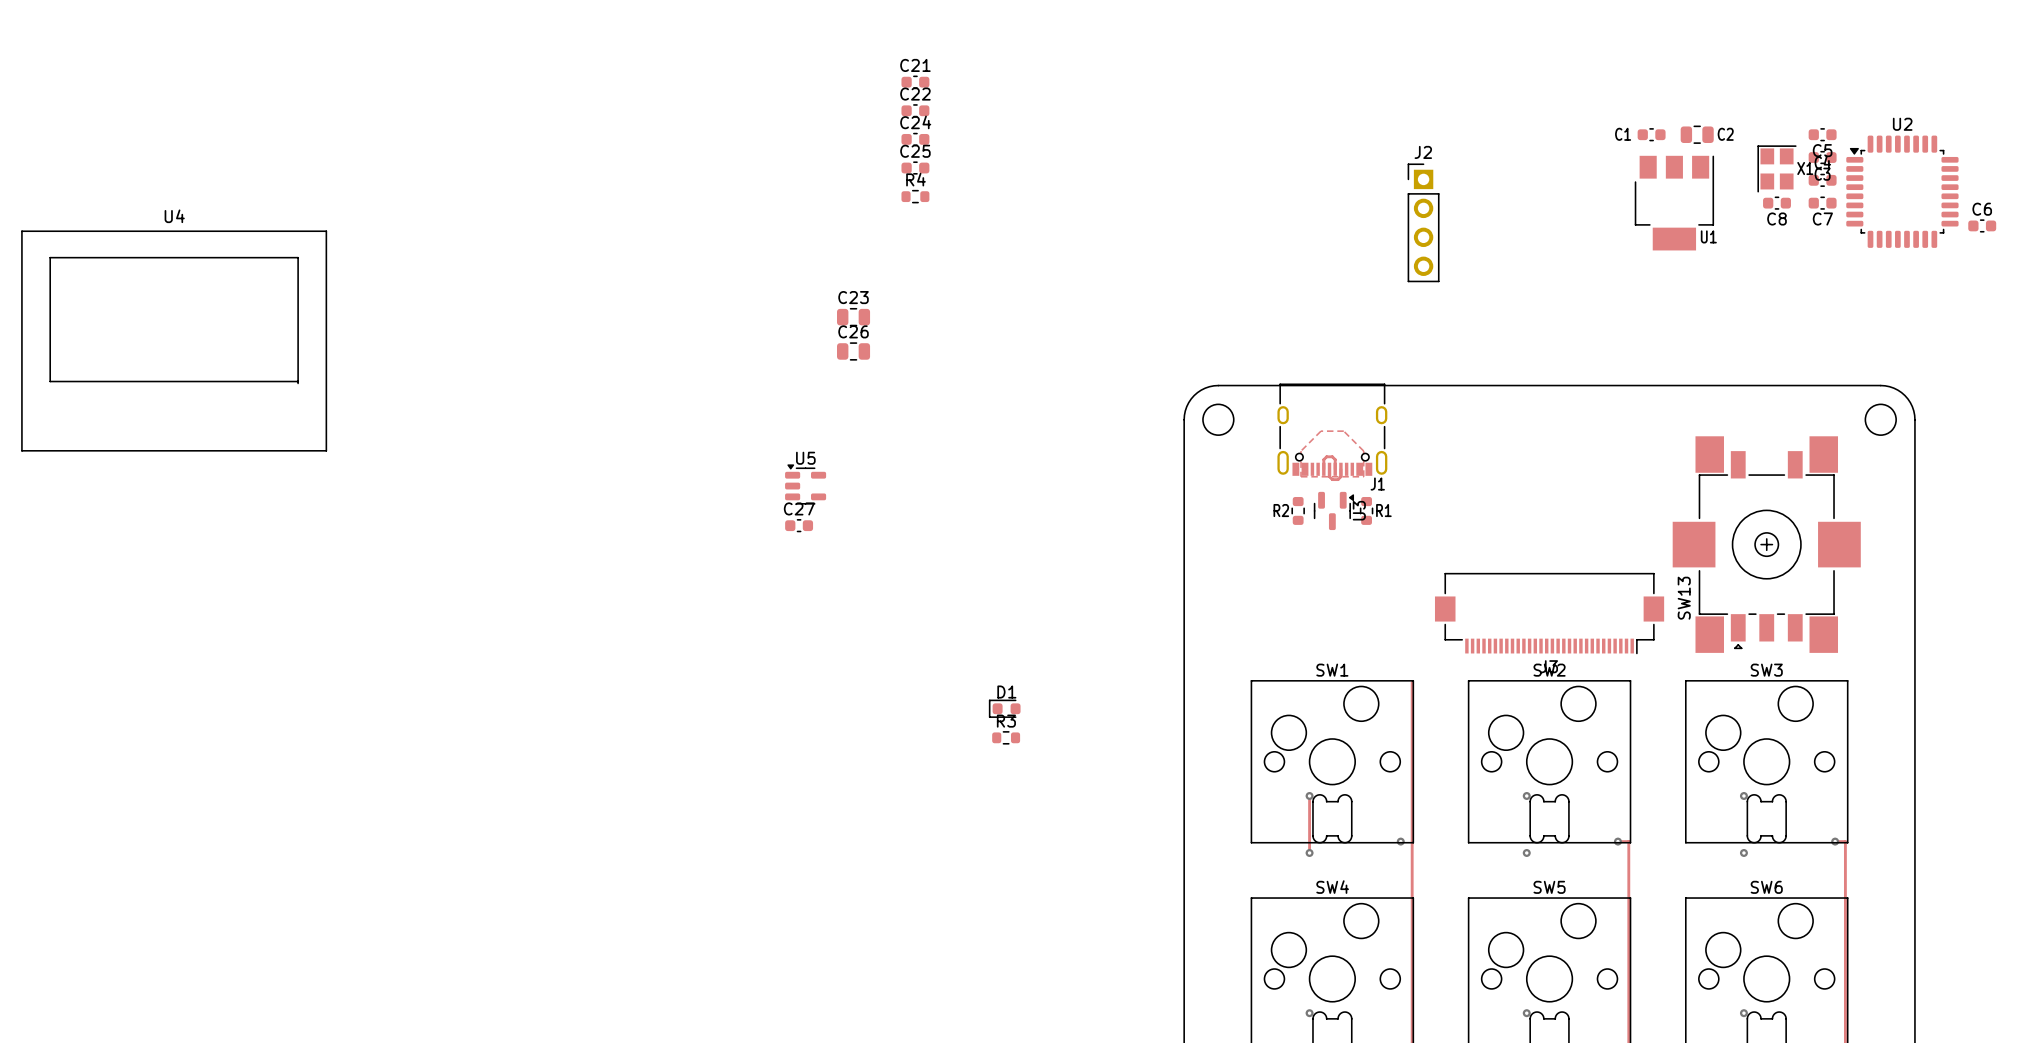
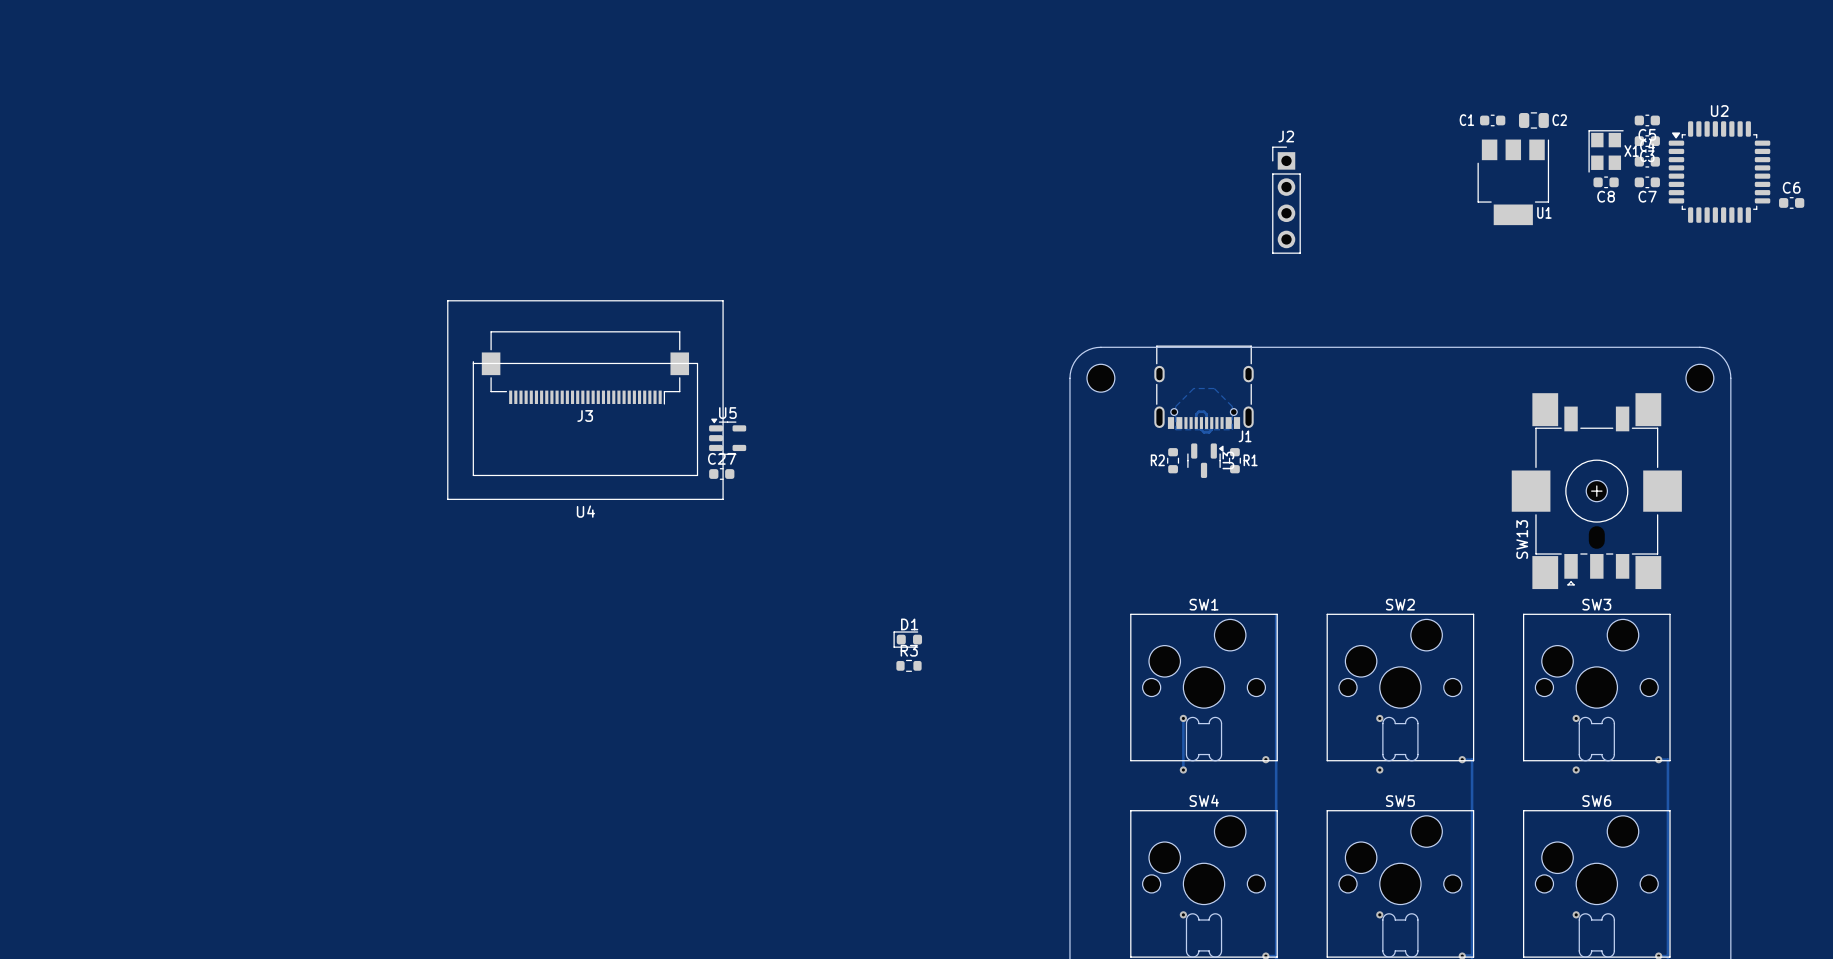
C21: (915, 82) -> none
C22: (915, 110) -> none
C24: (915, 139) -> none
C25: (915, 168) -> none
R4: (915, 196) -> none
C23: (853, 317) -> none
U4 rotation: 0° (174, 341) -> 180° (585, 400)
U4 position: (174, 341) -> (585, 400)
C26: (853, 351) -> none
J3 position: (1549, 613) -> (585, 367)

